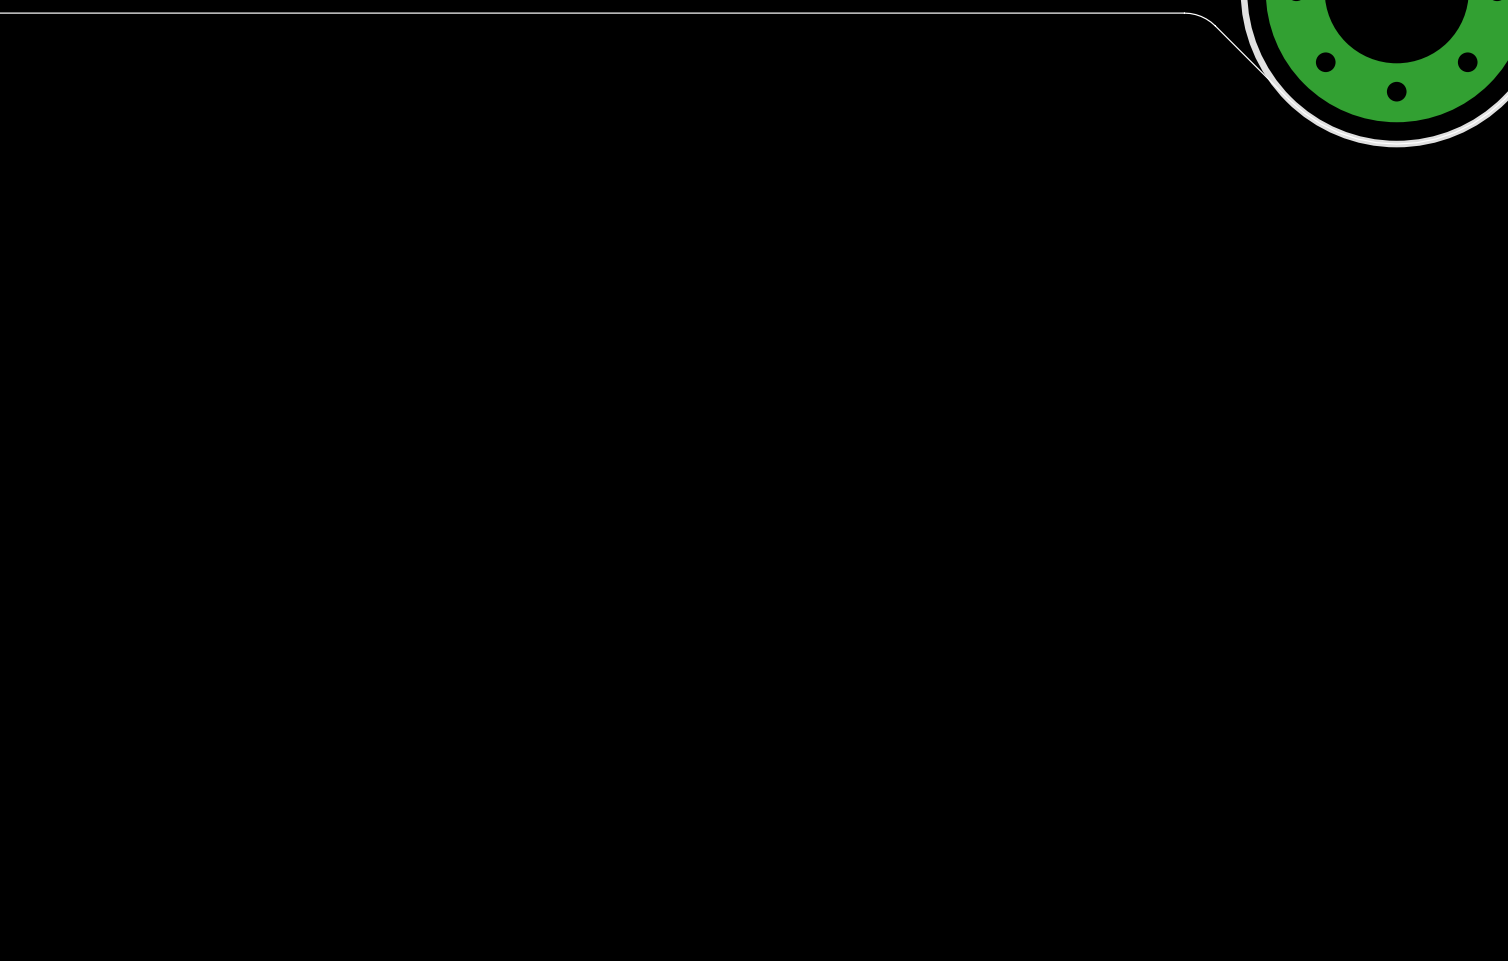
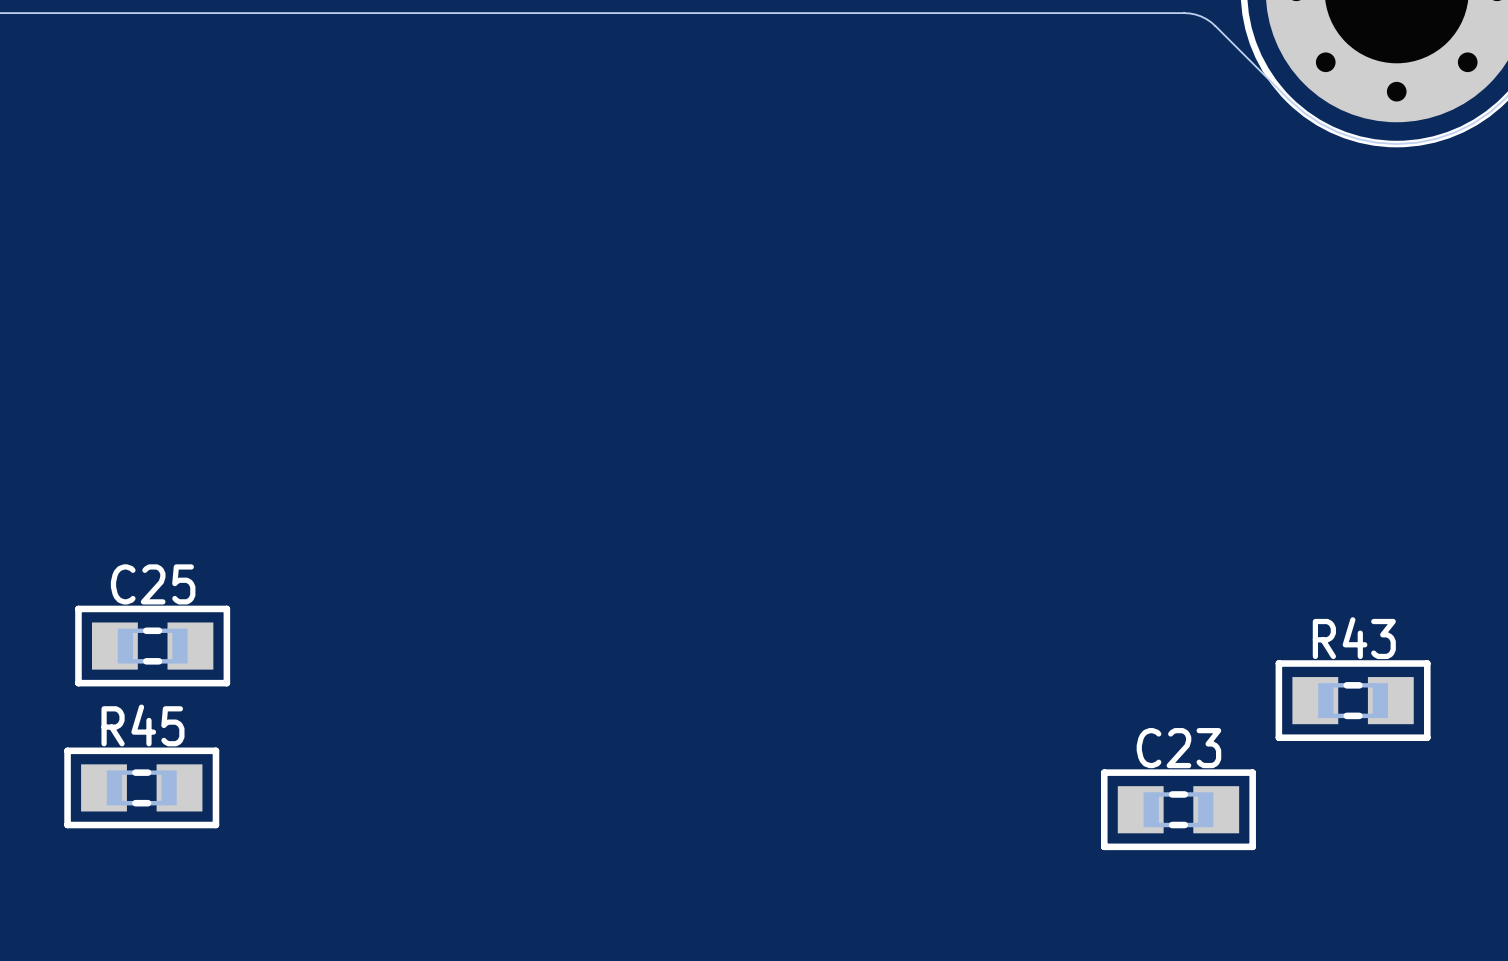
C25: none -> (152, 646)
R43: none -> (1353, 700)
R45: none -> (141, 787)
C23: none -> (1178, 809)

